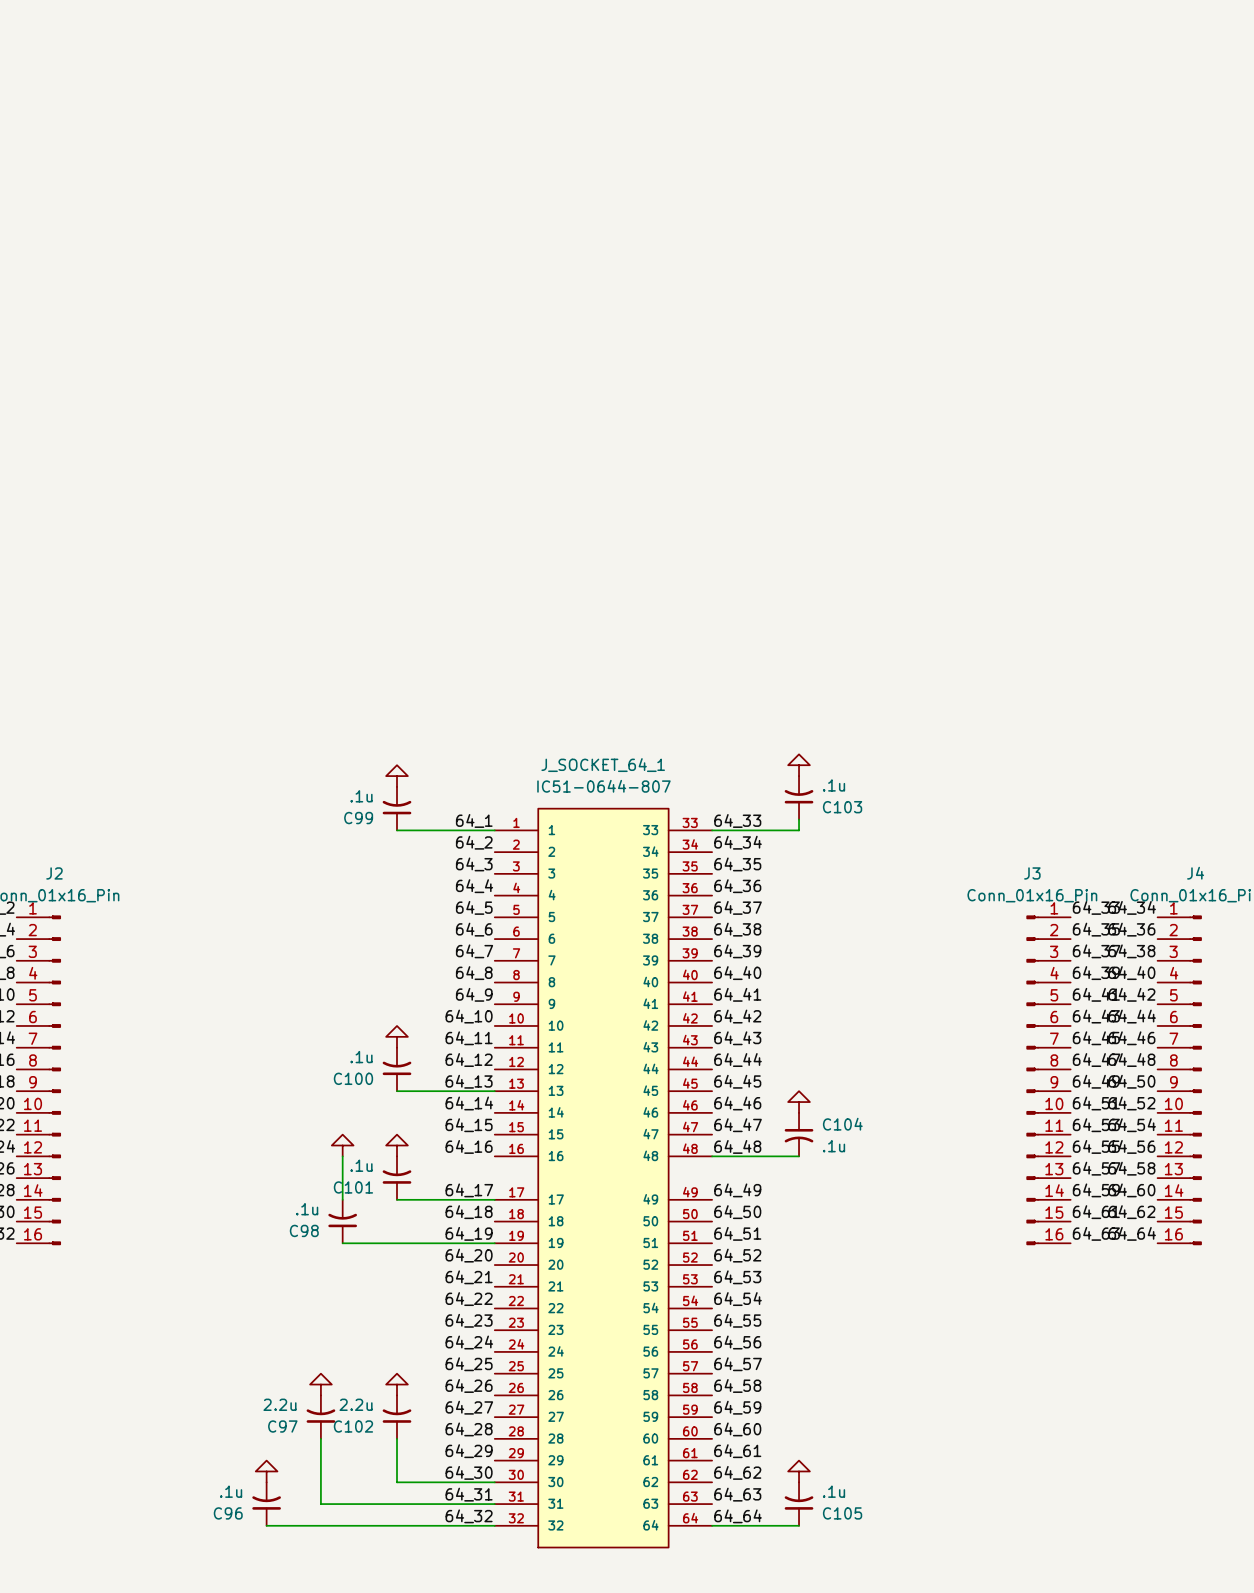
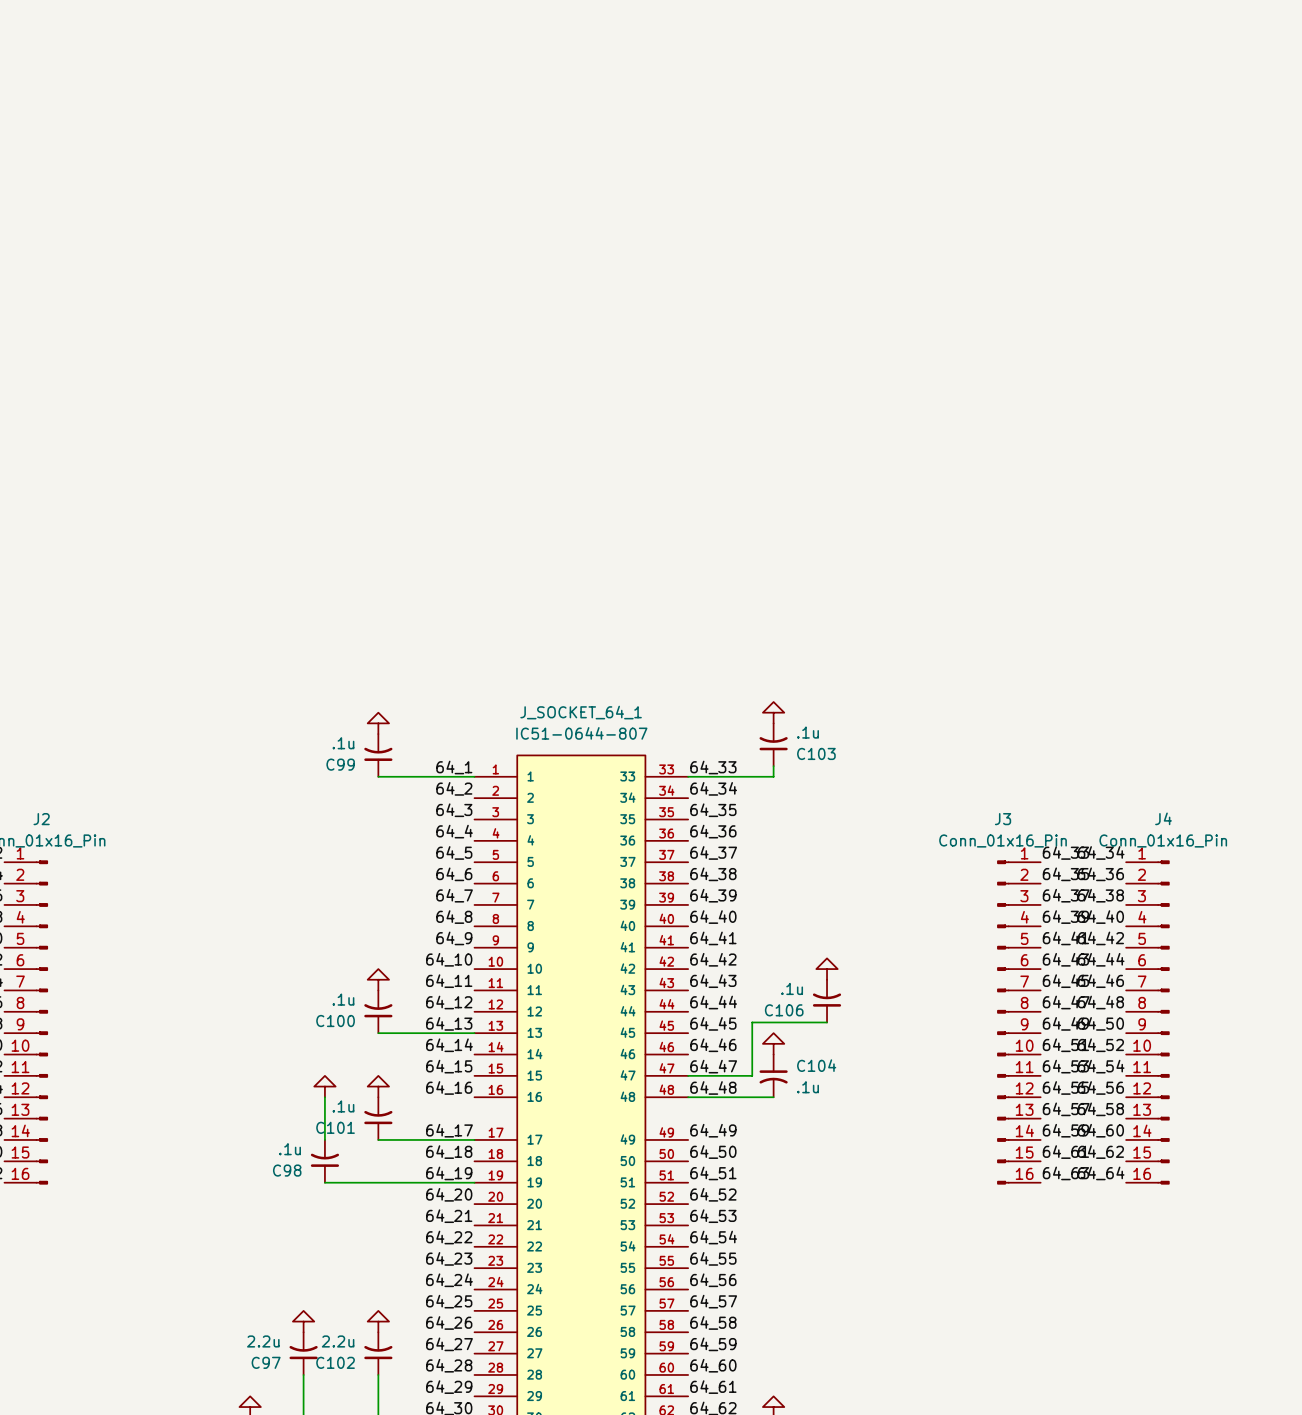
power symbol: none -> (827, 969)
C106: none -> .1u (827, 1001)
wire: none -> (827, 1022) (752, 1022) (752, 1075) (688, 1075)

